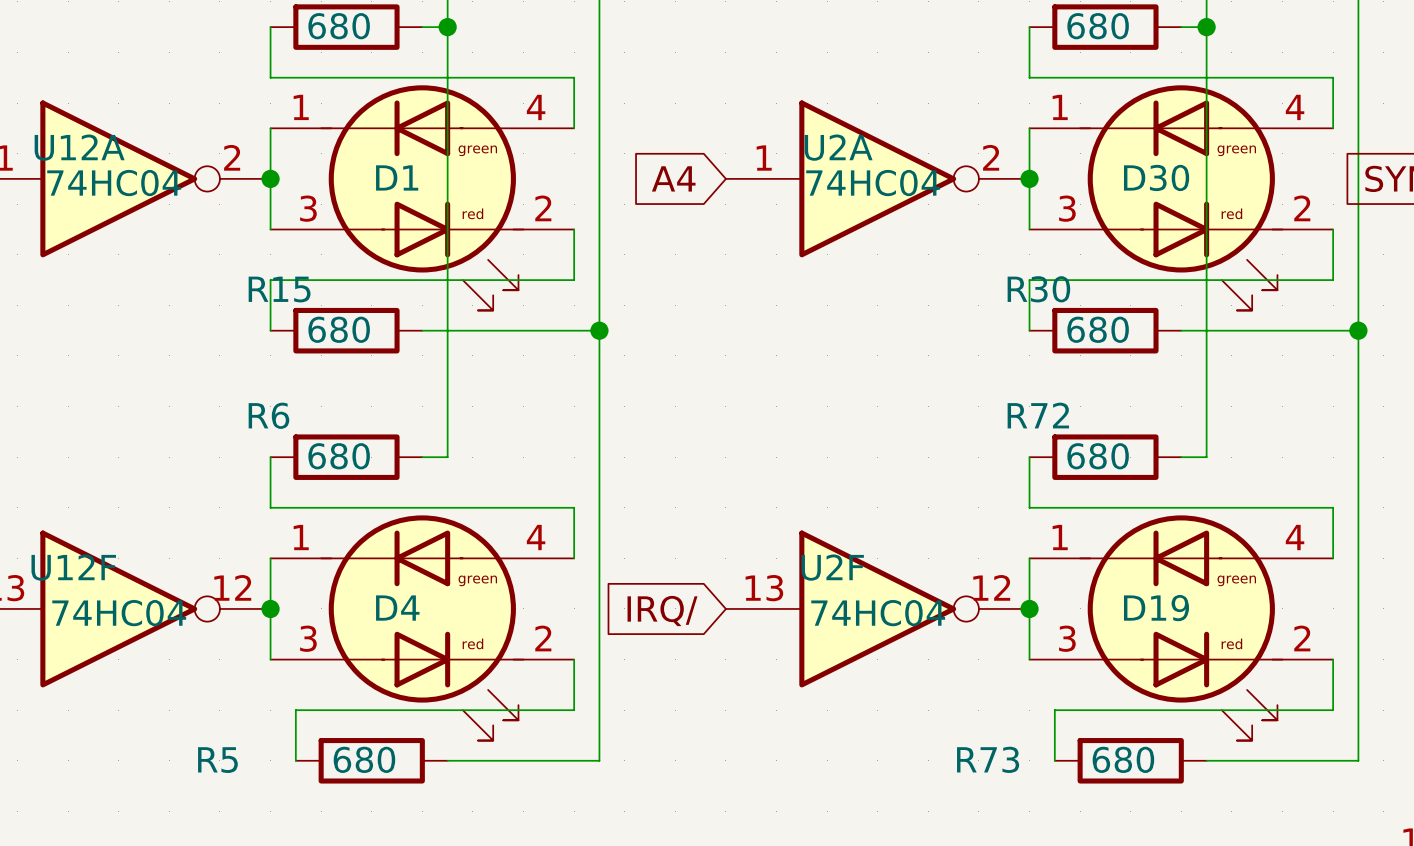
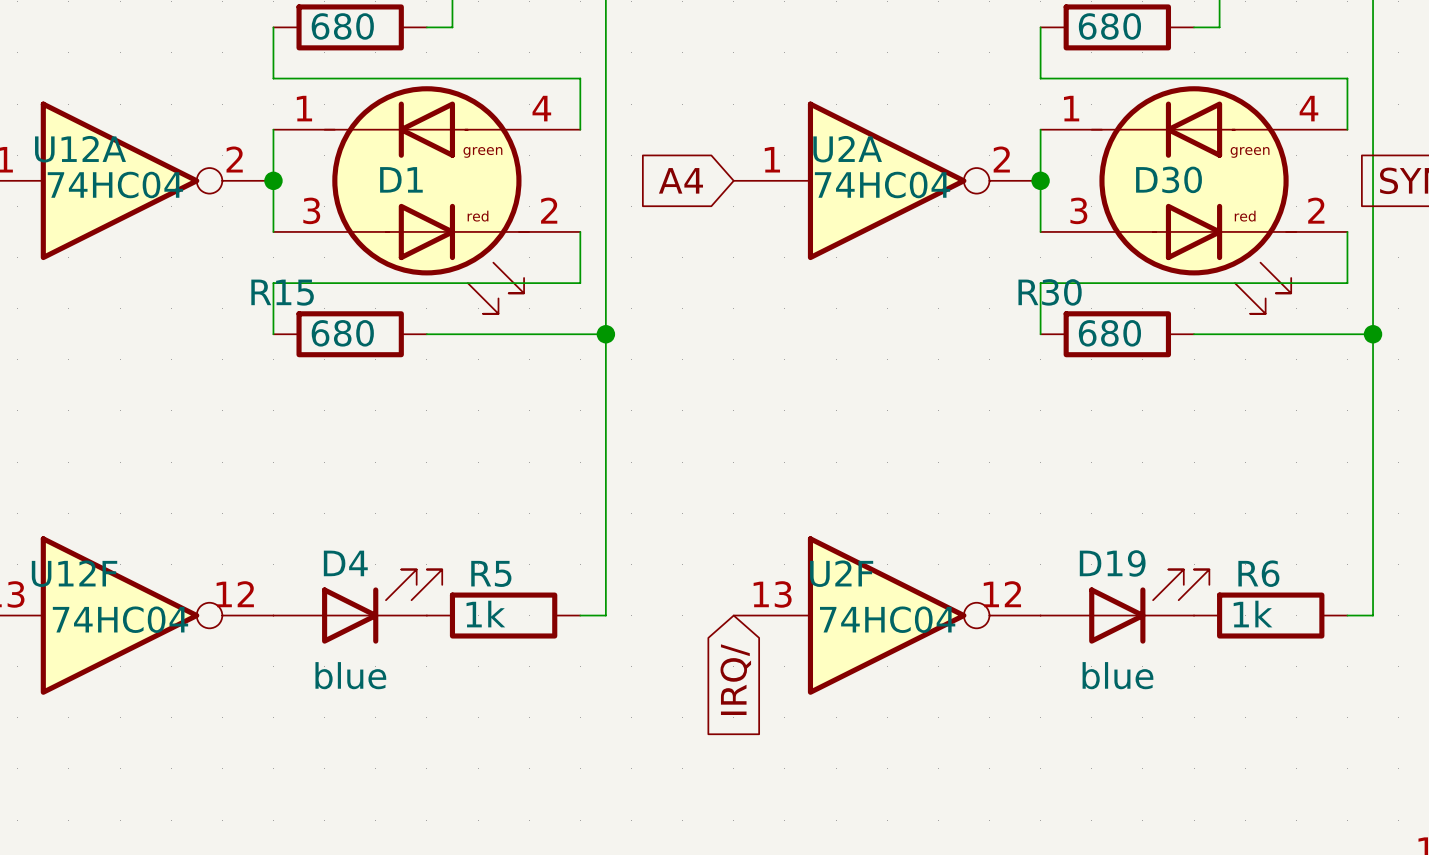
wire: (447, 27) (447, 457) (422, 457) -> none
junction: (447, 27) -> none
wire: (1206, 27) (1206, 457) (1181, 457) -> none
junction: (1206, 27) -> none
R6 name position: R6 (268, 415) -> R6 (1258, 573)
R6 value: 680 (339, 456) -> 1k (1253, 614)
wire: (270, 457) (270, 507) (574, 507) (574, 558) -> none
R6 position: (346, 457) -> (1270, 615)
wire: (1029, 457) (1029, 507) (1333, 507) (1333, 558) -> none
R72: 680 (1105, 457) -> none
D4 symbol: [270, 515, 575, 741] -> [273, 569, 443, 644]
D19 symbol: [1029, 515, 1334, 741] -> [1040, 569, 1210, 644]
wire: (270, 558) (270, 659) -> none
wire: (1029, 558) (1029, 659) -> none
junction: (270, 608) -> none
wire: (599, 608) (599, 760) (447, 760) -> (605, 615) (580, 615)
junction: (1029, 608) -> none
wire: (1358, 608) (1358, 760) (1206, 760) -> (1373, 615) (1347, 615)
global label rotation: 0° (662, 610) -> 90° counterclockwise (735, 679)
wire: (574, 659) (574, 710) (295, 710) (295, 760) -> none
wire: (1333, 659) (1333, 710) (1054, 710) (1054, 760) -> none
D4 value: none -> blue (350, 675)
D19 value: none -> blue (1117, 675)
R5 value: 680 (364, 759) -> 1k (485, 614)
R5 name position: R5 (217, 760) -> R5 (491, 573)
R5 position: (371, 760) -> (503, 615)
R73: 680 (1130, 760) -> none

